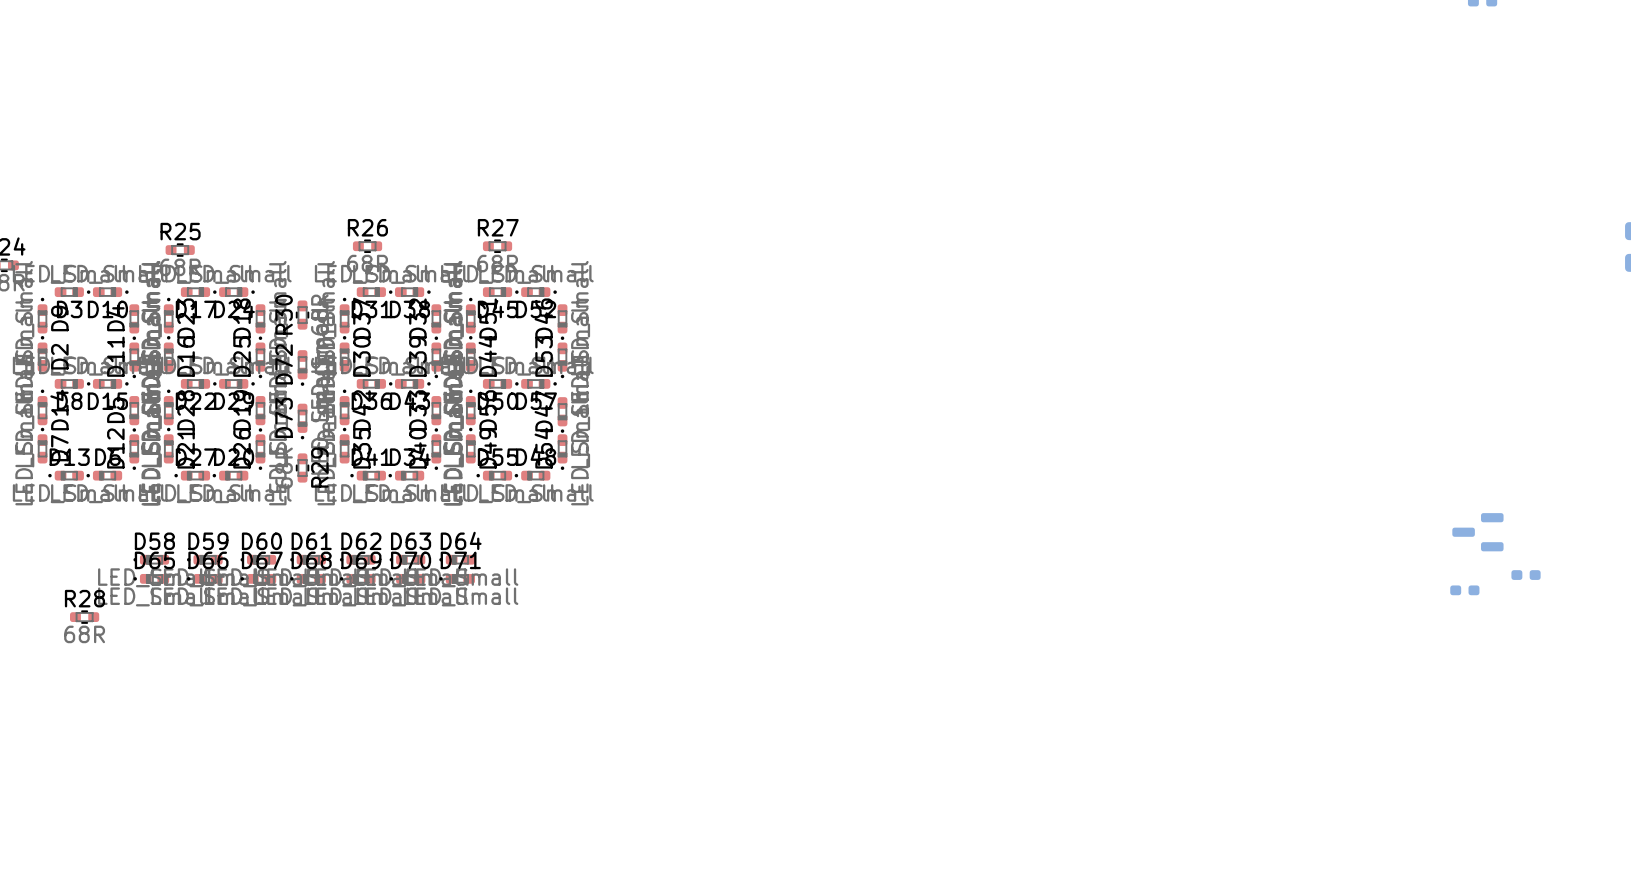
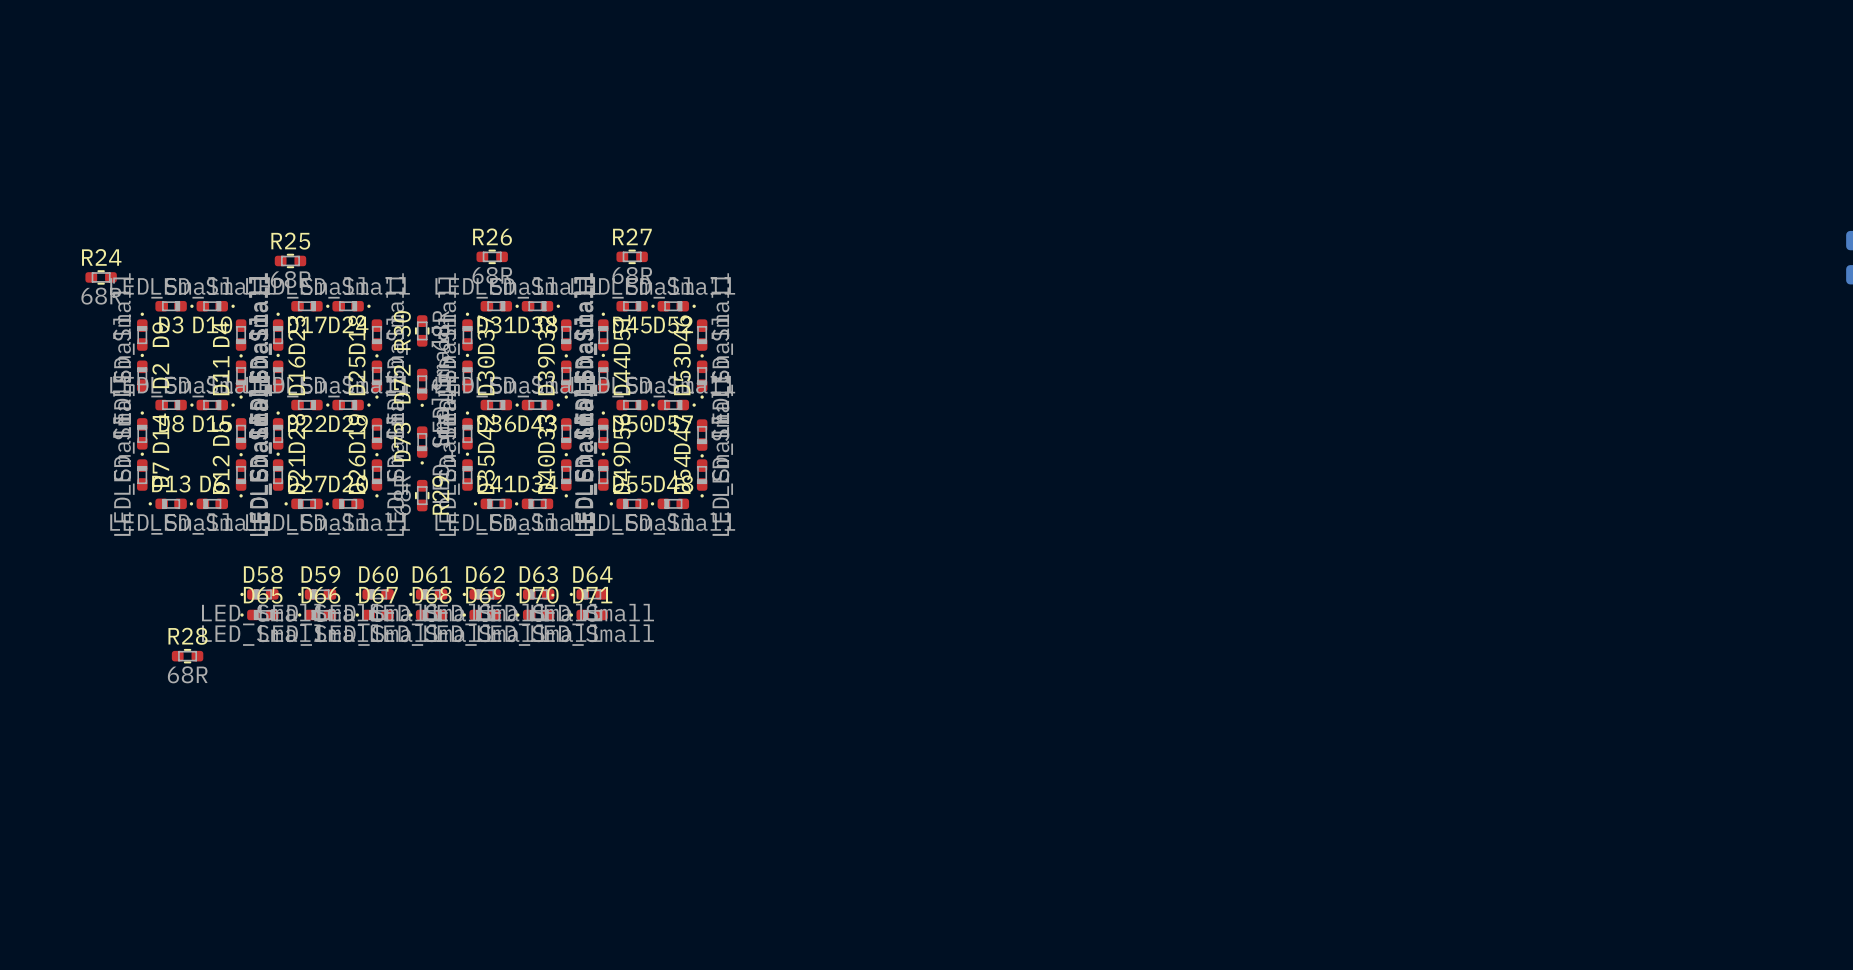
part: (1477, 532) -> none
part: (1526, 575) -> none
part: (1464, 590) -> none

